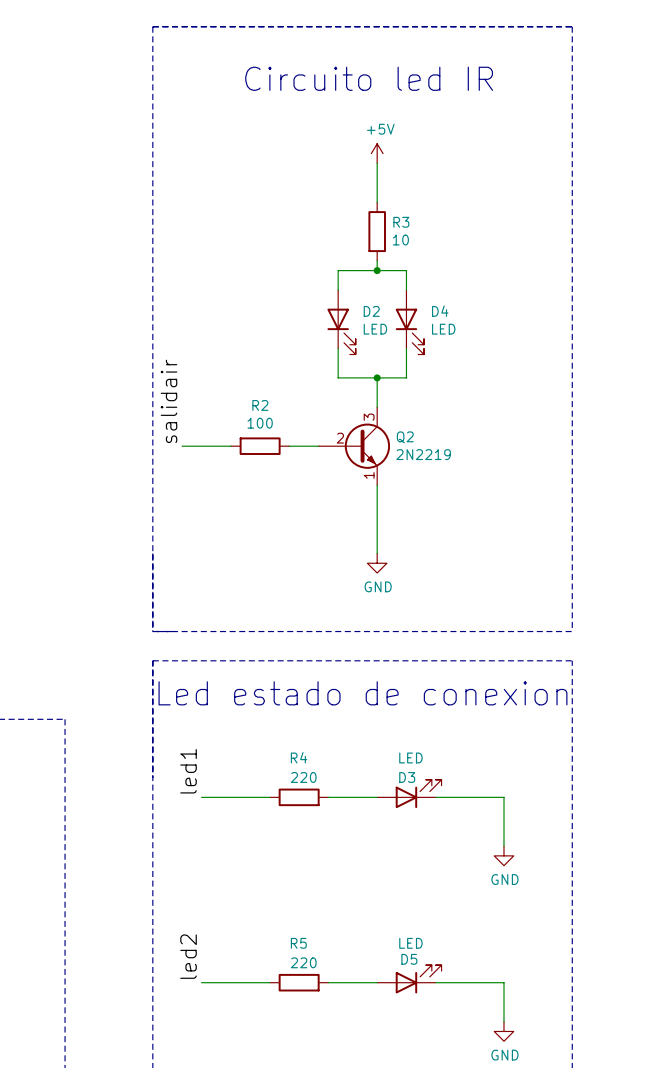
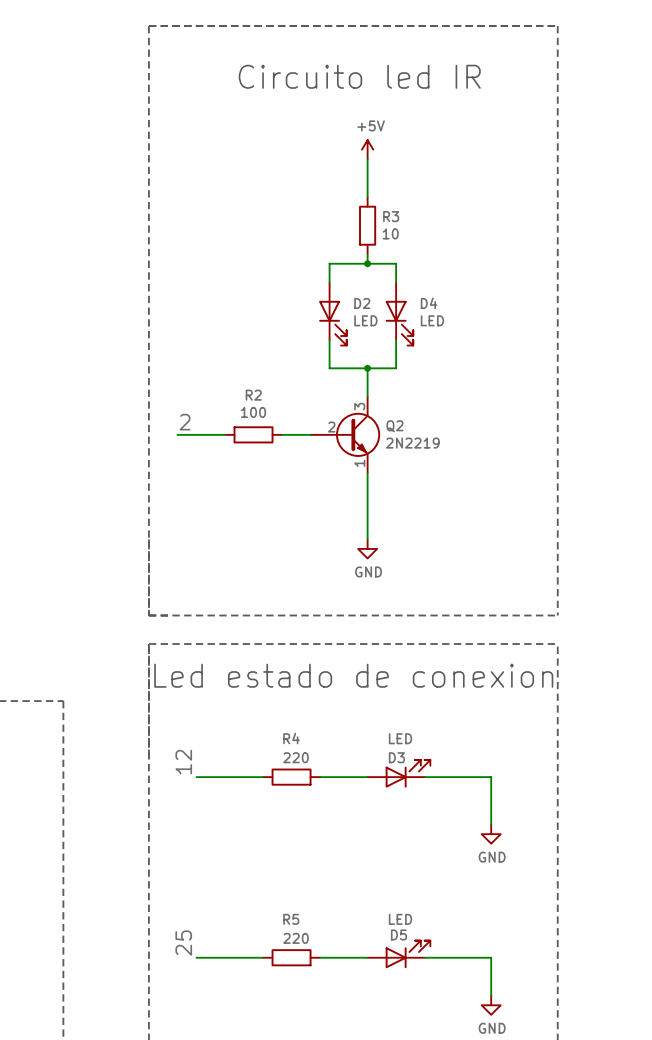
label: salidair (169, 401) -> 2 (185, 422)
label: led1 (188, 771) -> 12 (183, 762)
label: led2 (188, 956) -> 25 (183, 943)

